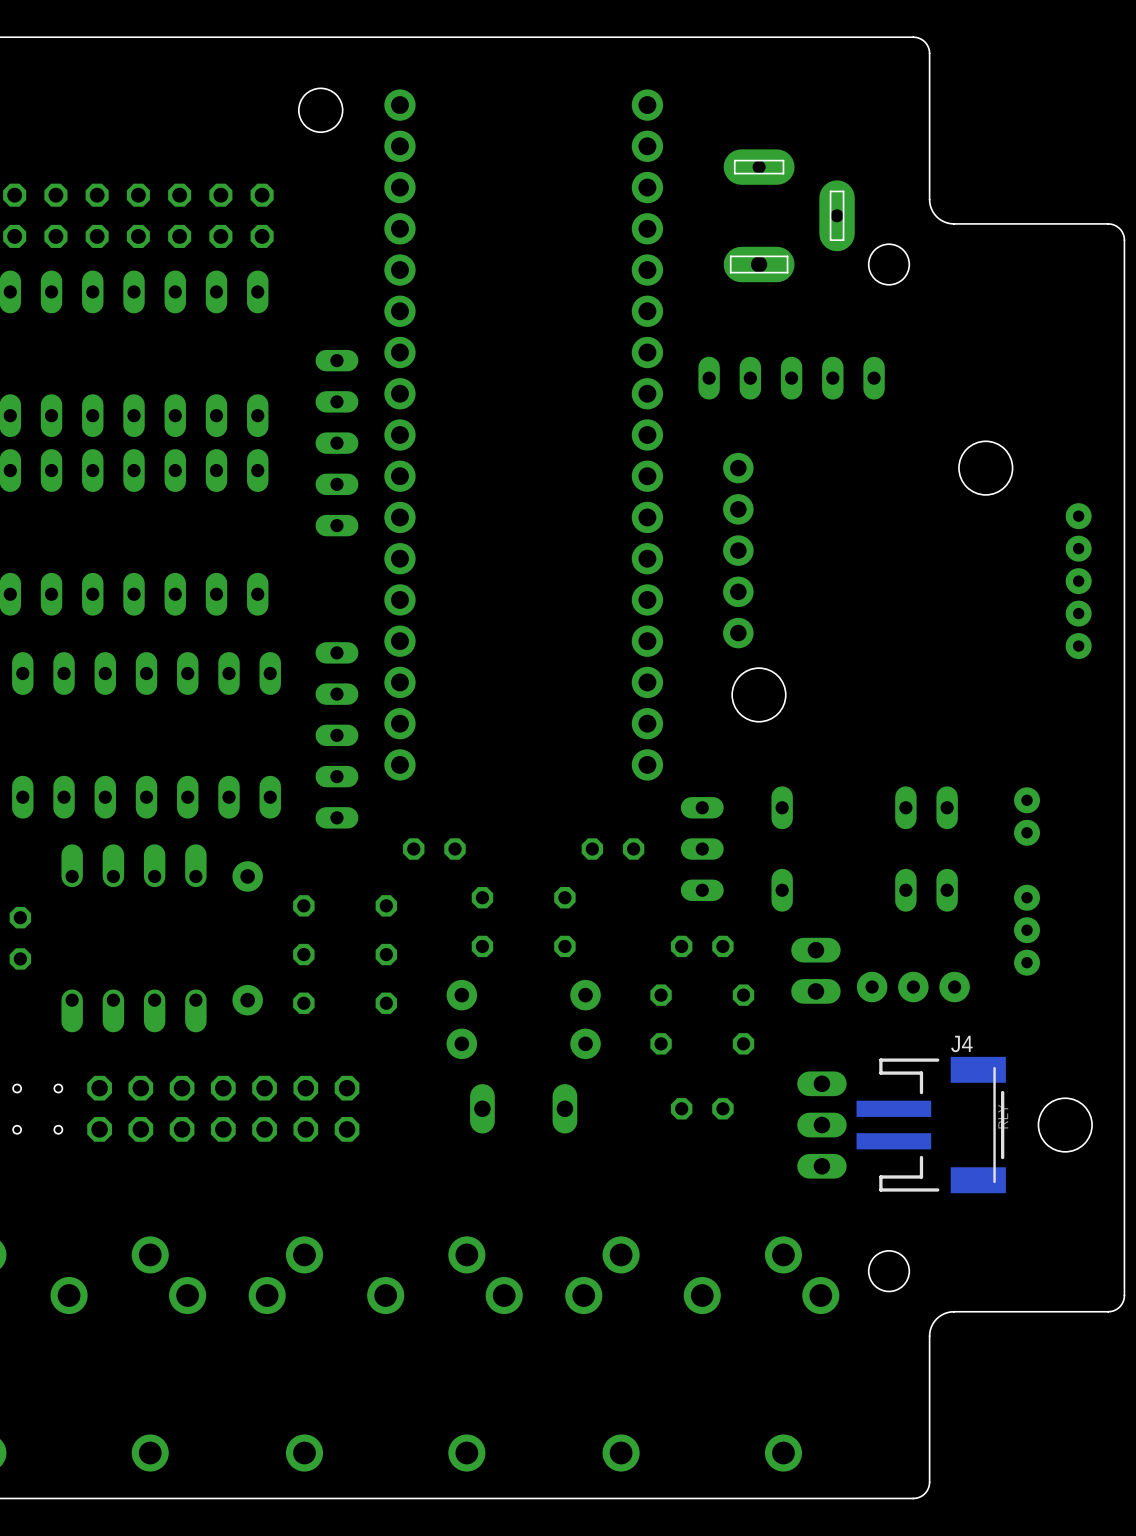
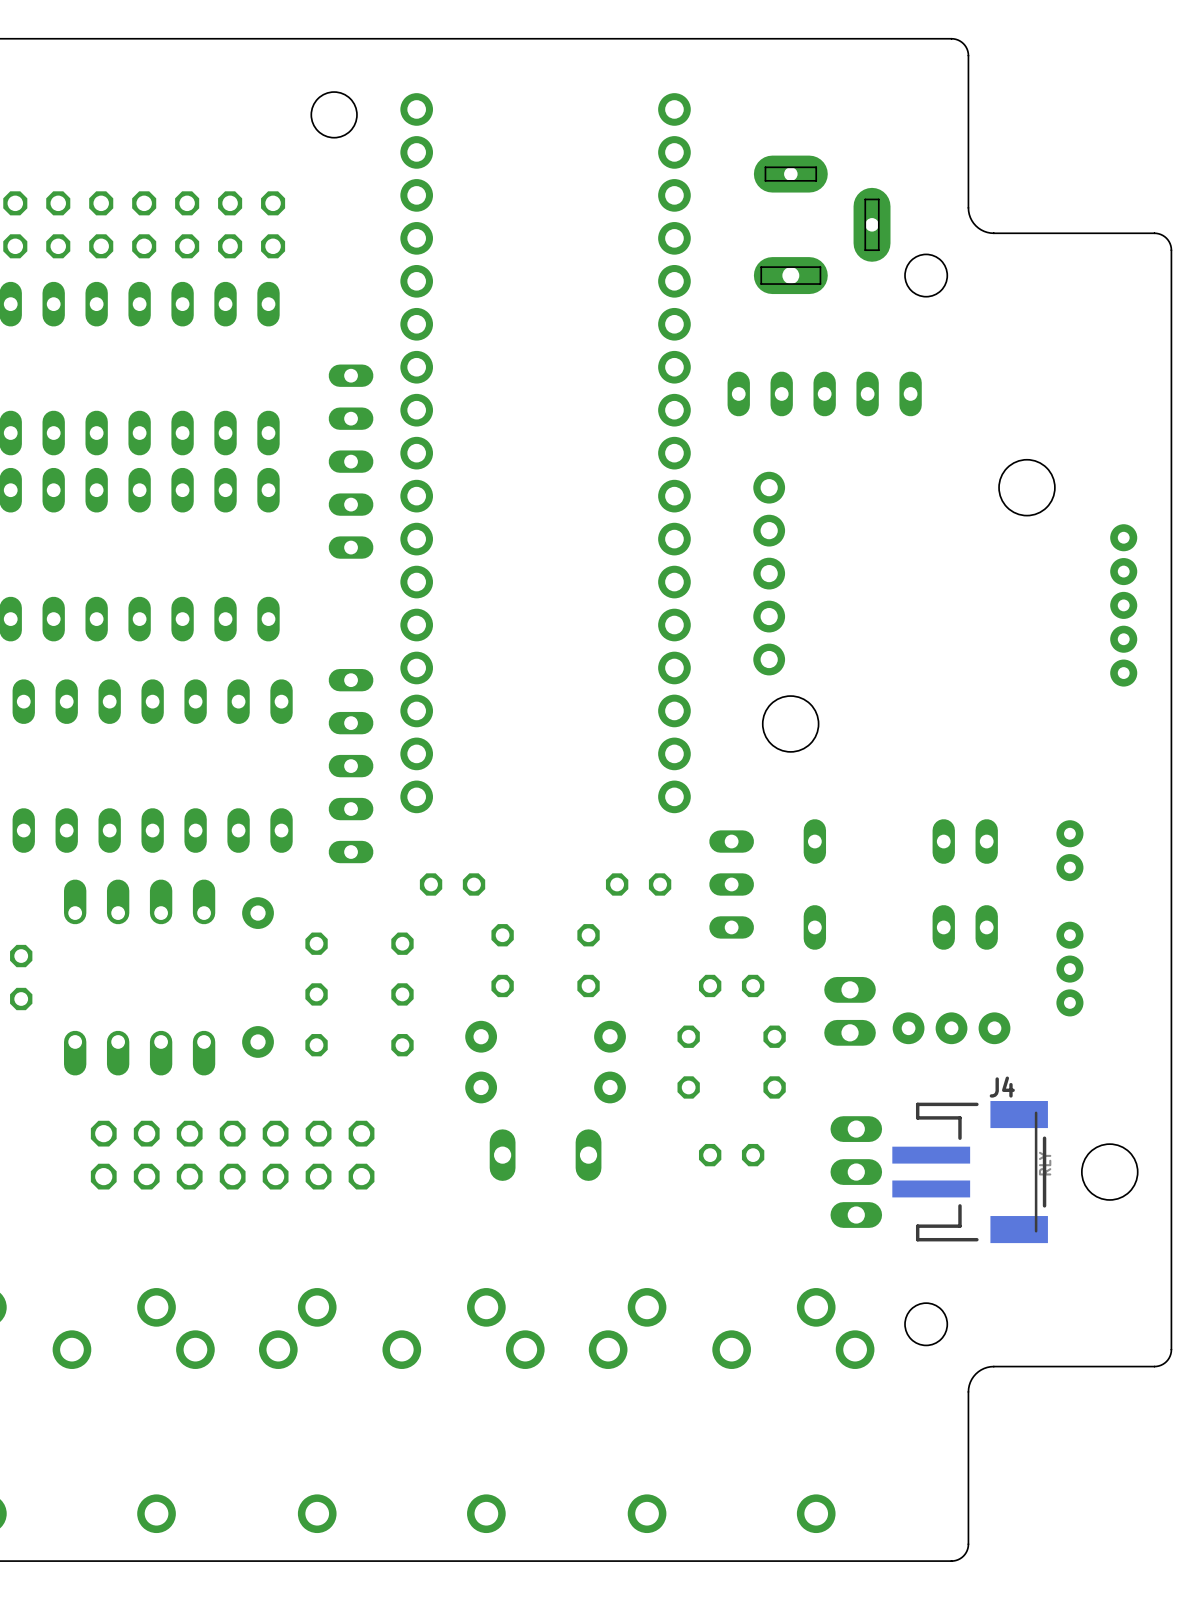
hole: (17, 1088) -> none
hole: (58, 1088) -> none
hole: (17, 1129) -> none
hole: (58, 1129) -> none

